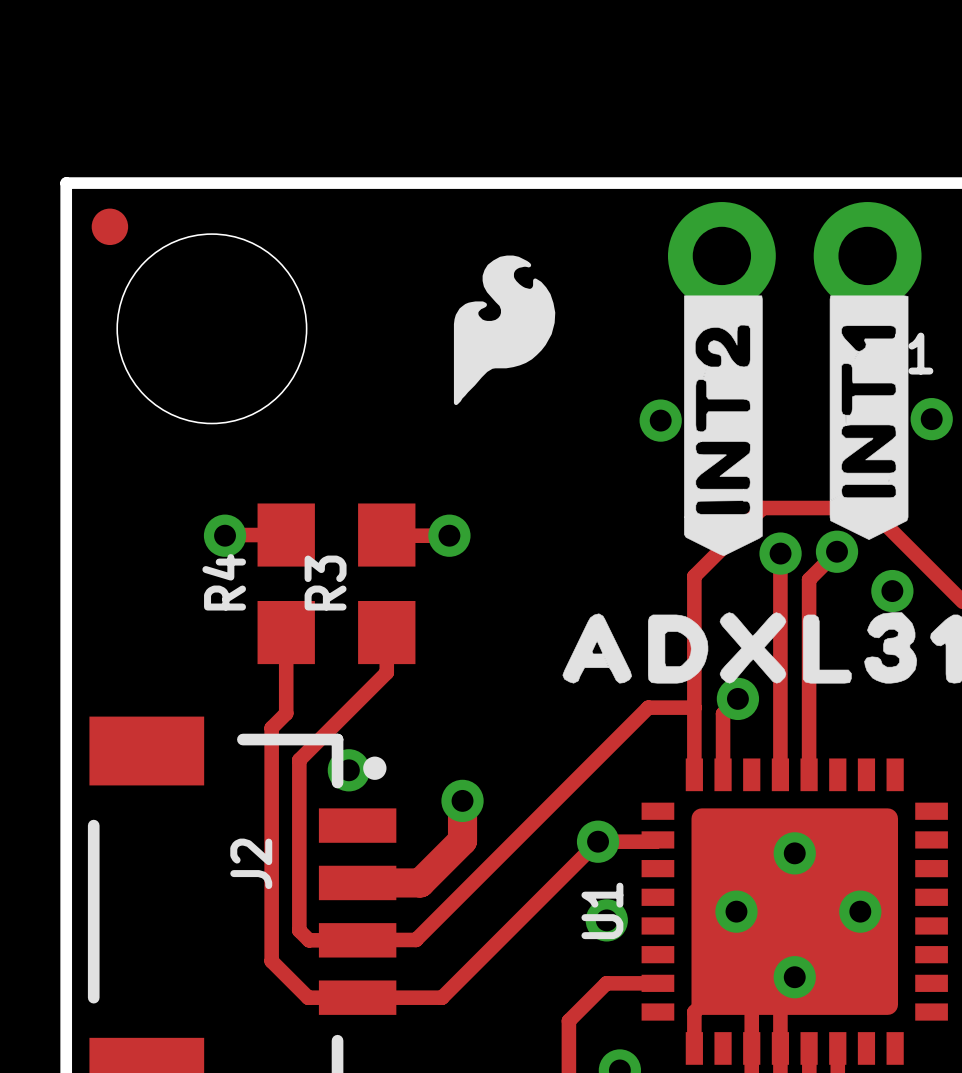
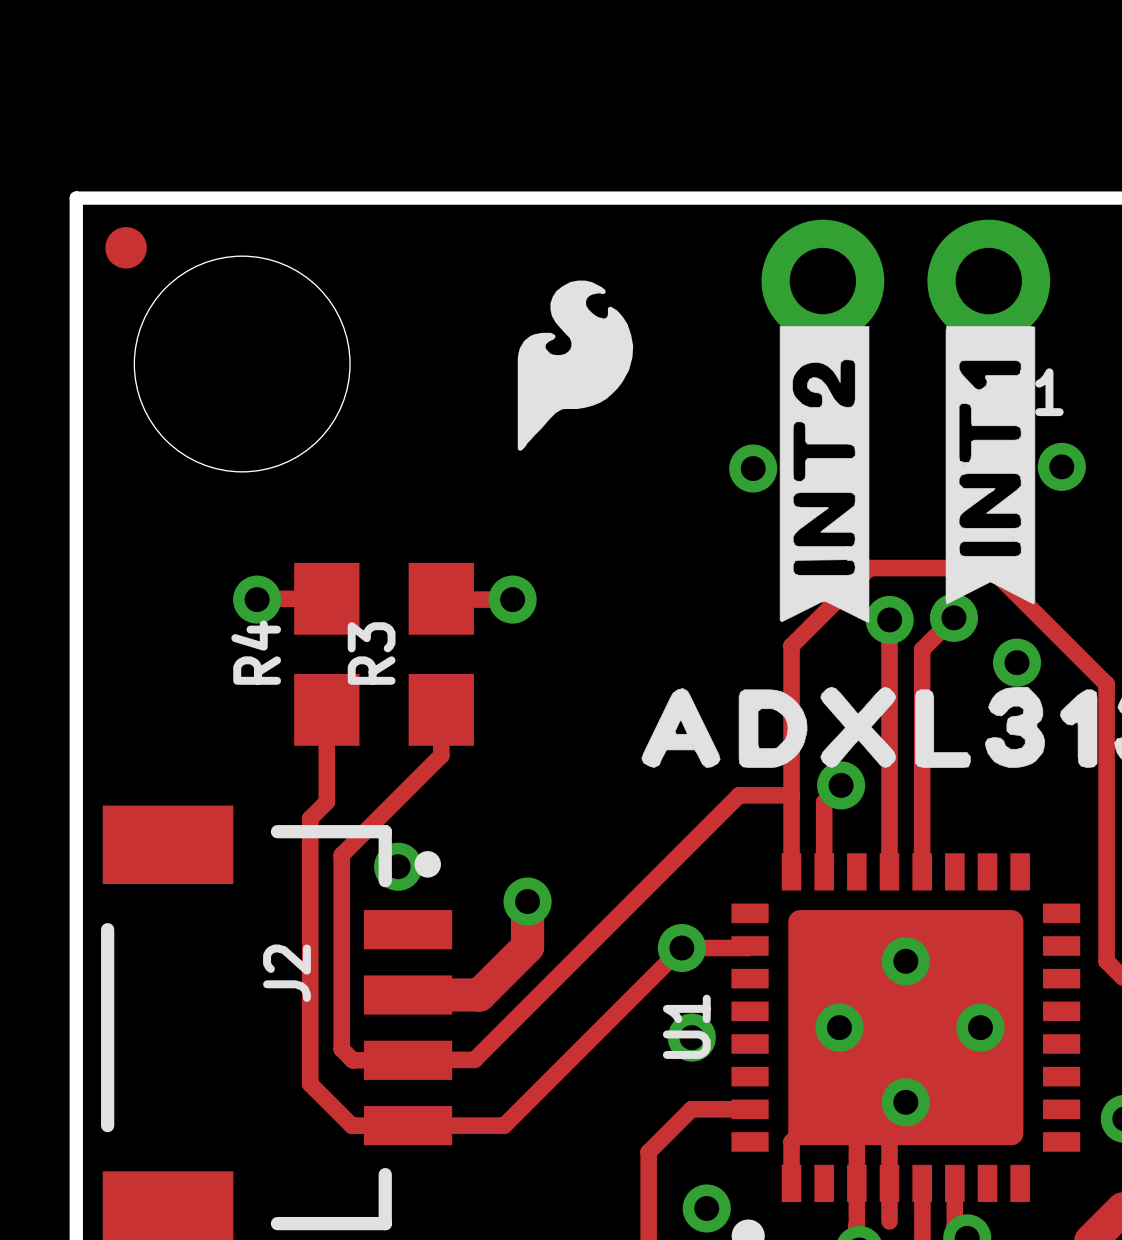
drawing shape: [684, 295, 763, 557] -> [779, 326, 870, 623]
drawing shape: [829, 295, 909, 540] -> [945, 326, 1036, 605]

